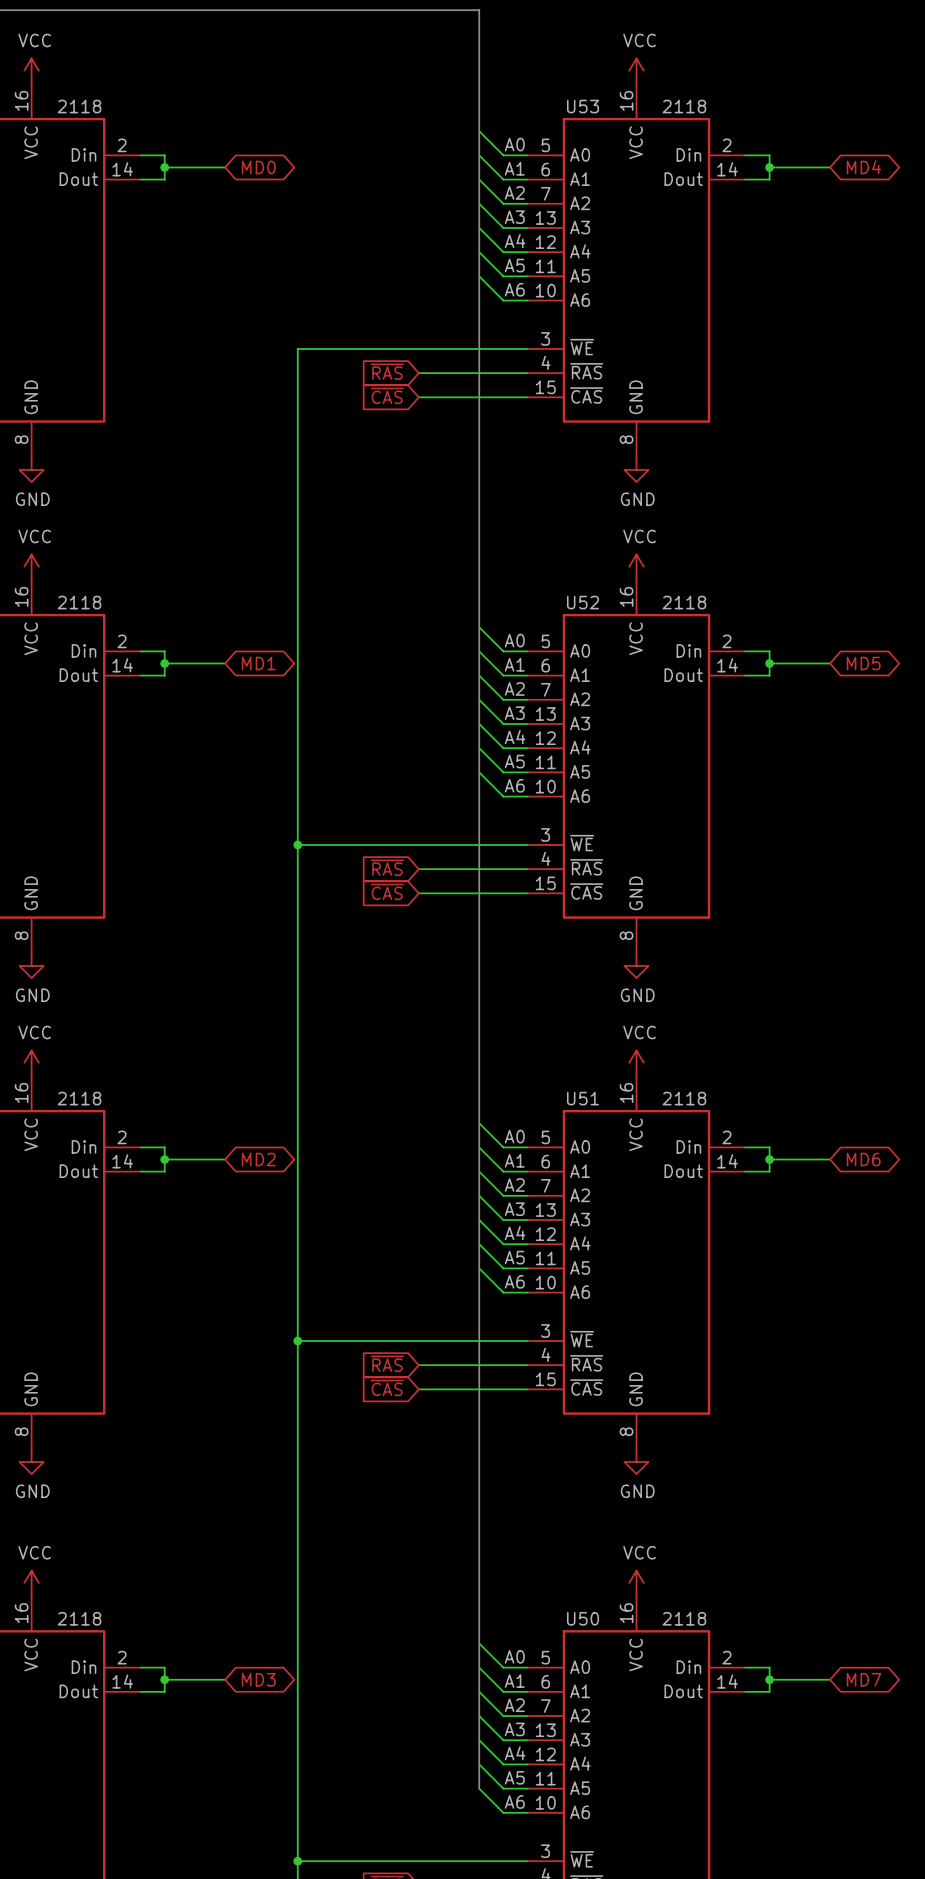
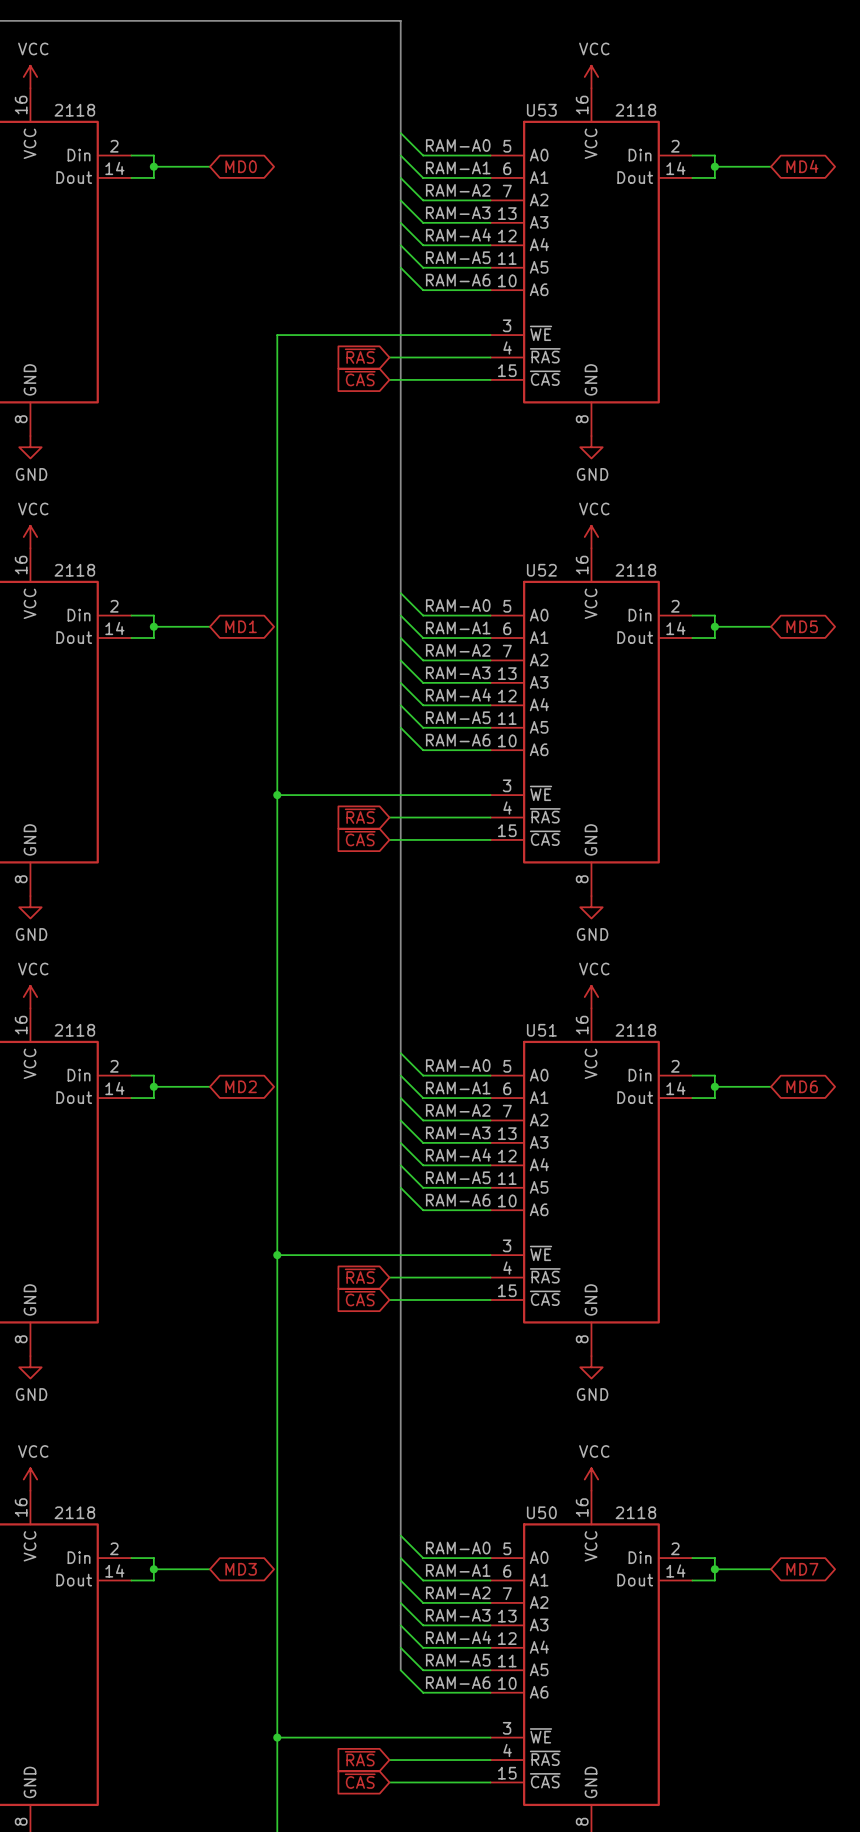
bus: (430, 10) (479, 10) (479, 1788) -> (400, 20) (400, 1670)
wire: (479, 131) (503, 155) -> (400, 133) (423, 155) (468, 155)
label: none -> RAM-A0 (458, 145)
label: A0 (514, 144) -> none
wire: (479, 155) (503, 179) -> (400, 155) (423, 177) (468, 177)
label: none -> RAM-A1 (458, 167)
label: A1 (514, 168) -> none
wire: (479, 179) (503, 203) -> (400, 177) (423, 200) (468, 200)
label: none -> RAM-A2 (458, 190)
label: A2 (514, 192) -> none
wire: (479, 203) (503, 227) -> (400, 200) (423, 222) (468, 222)
label: none -> RAM-A3 (458, 212)
label: A3 (514, 217) -> none
wire: (479, 227) (503, 252) -> (400, 222) (423, 245) (468, 245)
label: none -> RAM-A4 (458, 235)
label: A4 (515, 241) -> none
wire: (479, 252) (503, 276) -> (400, 245) (423, 267) (468, 267)
label: none -> RAM-A5 (458, 257)
label: A5 (514, 265) -> none
wire: (479, 276) (503, 300) -> (400, 267) (423, 290) (468, 290)
label: none -> RAM-A6 (458, 280)
label: A6 (514, 289) -> none
wire: (479, 627) (503, 651) -> (400, 593) (423, 615) (468, 615)
label: none -> RAM-A0 (458, 605)
label: A0 (514, 640) -> none
wire: (479, 651) (503, 675) -> (400, 615) (423, 638) (468, 638)
label: none -> RAM-A1 (458, 627)
label: A1 (514, 664) -> none
wire: (479, 675) (503, 699) -> (400, 638) (423, 660) (468, 660)
label: none -> RAM-A2 (458, 650)
label: A2 (514, 688) -> none
wire: (479, 699) (503, 723) -> (400, 660) (423, 682) (468, 682)
label: none -> RAM-A3 (458, 672)
label: A3 (514, 713) -> none
wire: (479, 723) (503, 748) -> (400, 682) (423, 705) (468, 705)
label: none -> RAM-A4 (458, 695)
label: A4 (515, 737) -> none
wire: (479, 748) (503, 772) -> (400, 705) (423, 727) (468, 727)
label: none -> RAM-A5 (458, 717)
label: A5 (514, 761) -> none
wire: (479, 772) (503, 796) -> (400, 727) (423, 750) (468, 750)
label: none -> RAM-A6 (458, 740)
label: A6 (514, 785) -> none
wire: (479, 1123) (503, 1147) -> (400, 1053) (423, 1075) (468, 1075)
label: none -> RAM-A0 (458, 1065)
label: A0 (514, 1136) -> none
wire: (479, 1147) (503, 1171) -> (400, 1075) (423, 1098) (468, 1098)
label: none -> RAM-A1 (458, 1088)
label: A1 (514, 1160) -> none
wire: (479, 1171) (503, 1195) -> (400, 1098) (423, 1120) (468, 1120)
label: none -> RAM-A2 (458, 1110)
label: A2 (514, 1185) -> none
wire: (479, 1195) (503, 1220) -> (400, 1120) (423, 1142) (468, 1142)
label: none -> RAM-A3 (458, 1132)
label: A3 (514, 1209) -> none
wire: (479, 1220) (503, 1244) -> (400, 1142) (423, 1165) (468, 1165)
label: none -> RAM-A4 (458, 1155)
label: A4 (515, 1233) -> none
wire: (479, 1244) (503, 1268) -> (400, 1165) (423, 1187) (468, 1187)
label: none -> RAM-A5 (458, 1177)
label: A5 (514, 1257) -> none
wire: (479, 1268) (503, 1292) -> (400, 1187) (423, 1210) (468, 1210)
label: none -> RAM-A6 (458, 1200)
label: A6 (514, 1281) -> none
wire: (479, 1643) (503, 1667) -> (400, 1535) (423, 1558) (468, 1558)
label: none -> RAM-A0 (458, 1548)
label: A0 (514, 1656) -> none
wire: (479, 1667) (503, 1691) -> (400, 1558) (423, 1580) (468, 1580)
label: none -> RAM-A1 (458, 1570)
label: A1 (514, 1681) -> none
wire: (479, 1691) (503, 1716) -> (400, 1580) (423, 1602) (468, 1602)
label: none -> RAM-A2 (458, 1592)
label: A2 (514, 1705) -> none
wire: (479, 1716) (503, 1740) -> (400, 1602) (423, 1625) (468, 1625)
label: none -> RAM-A3 (458, 1615)
label: A3 (514, 1729) -> none
wire: (479, 1740) (503, 1764) -> (400, 1625) (423, 1647) (468, 1647)
label: none -> RAM-A4 (458, 1637)
label: A4 (515, 1753) -> none
wire: (479, 1764) (503, 1788) -> (400, 1647) (423, 1670) (468, 1670)
label: none -> RAM-A5 (458, 1660)
label: A5 (514, 1777) -> none
wire: (479, 1788) (503, 1812) -> (400, 1670) (423, 1692) (468, 1692)
label: none -> RAM-A6 (458, 1682)
label: A6 (514, 1802) -> none

